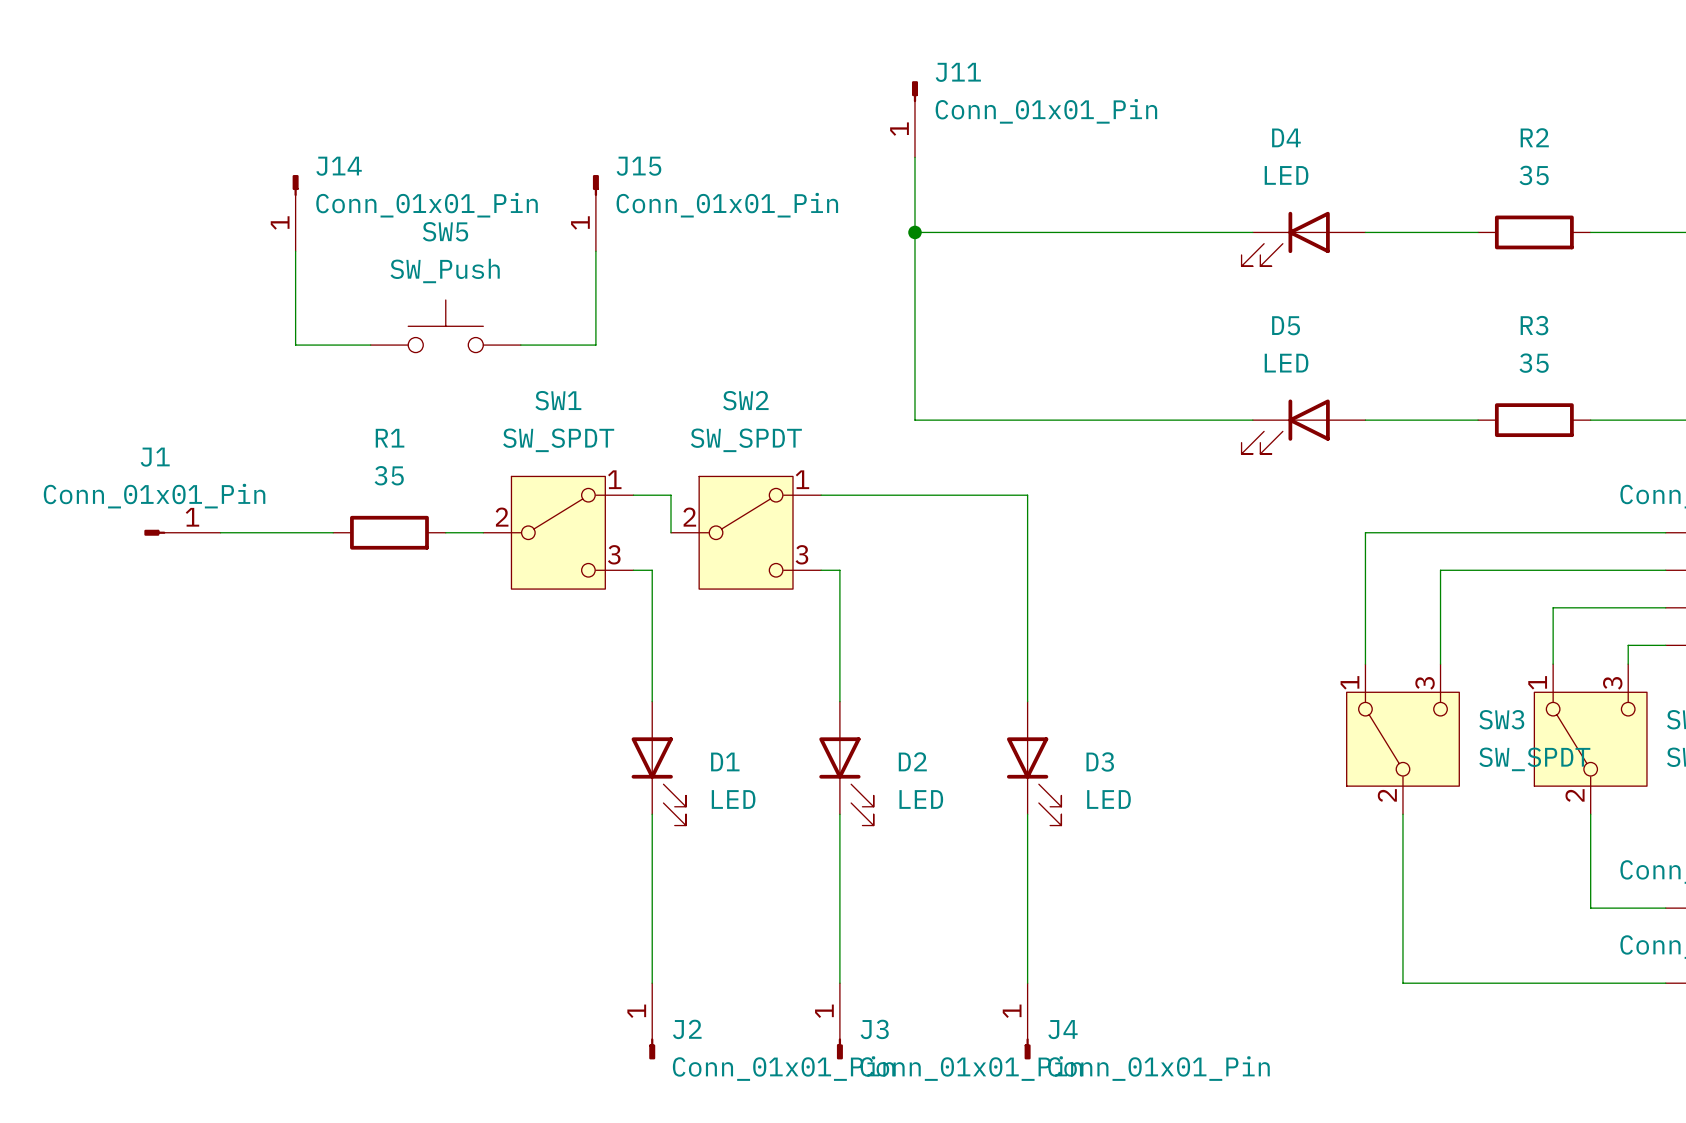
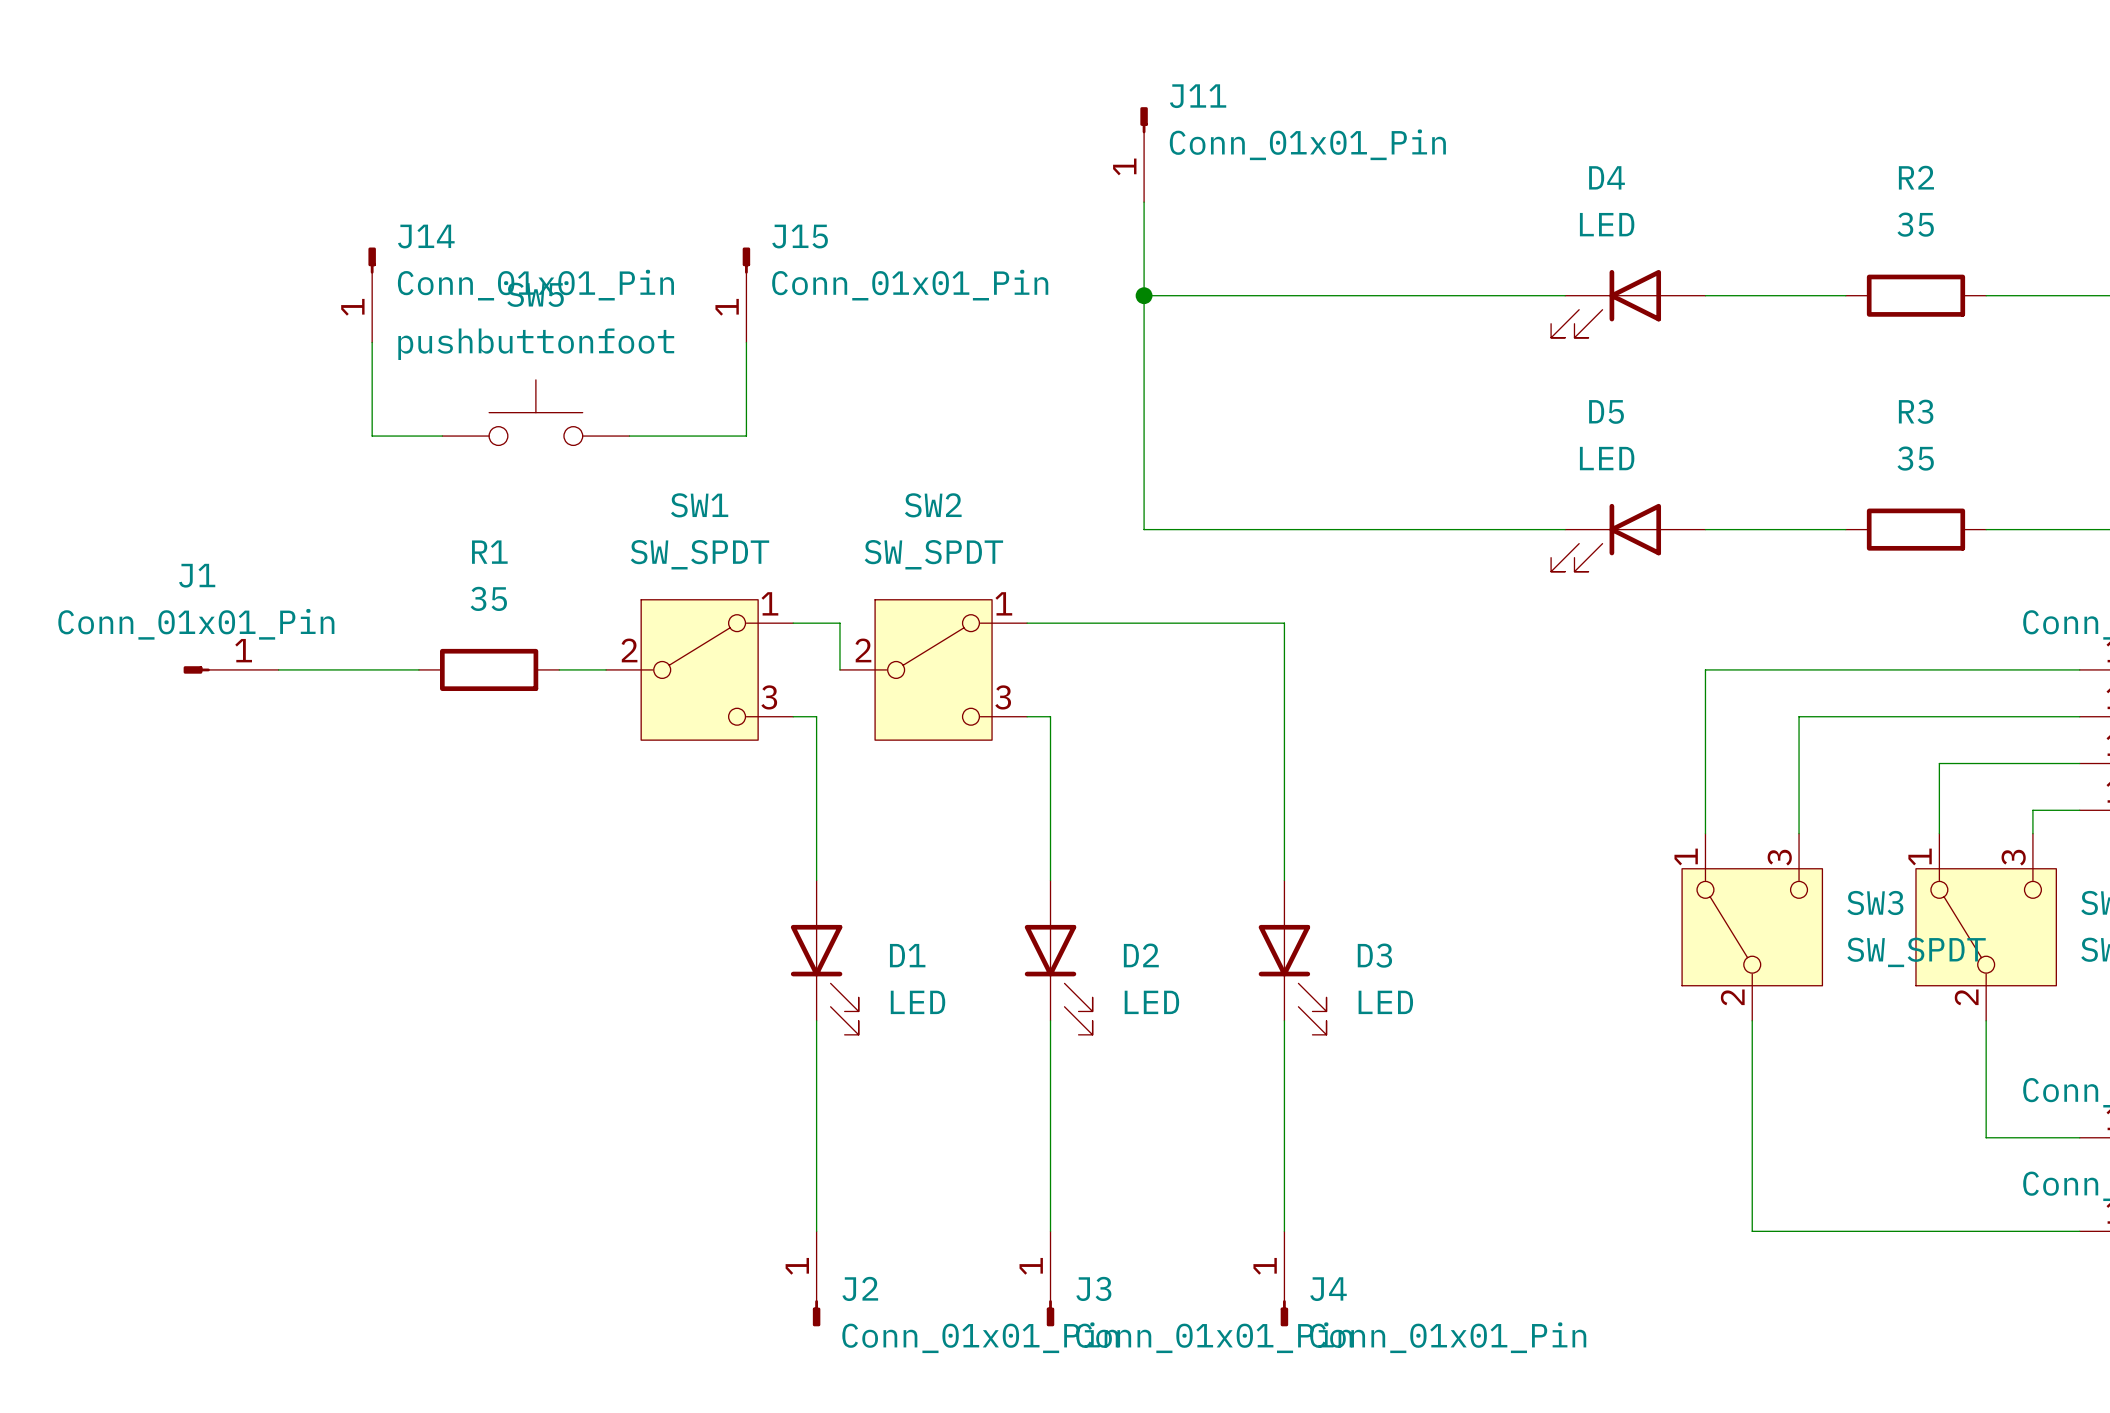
J14 position: (295, 213) -> (372, 294)
J15 position: (595, 213) -> (746, 294)
SW5 value: SW_Push (445, 270) -> pushbuttonfoot (536, 344)
SW5 position: (445, 326) -> (535, 412)

